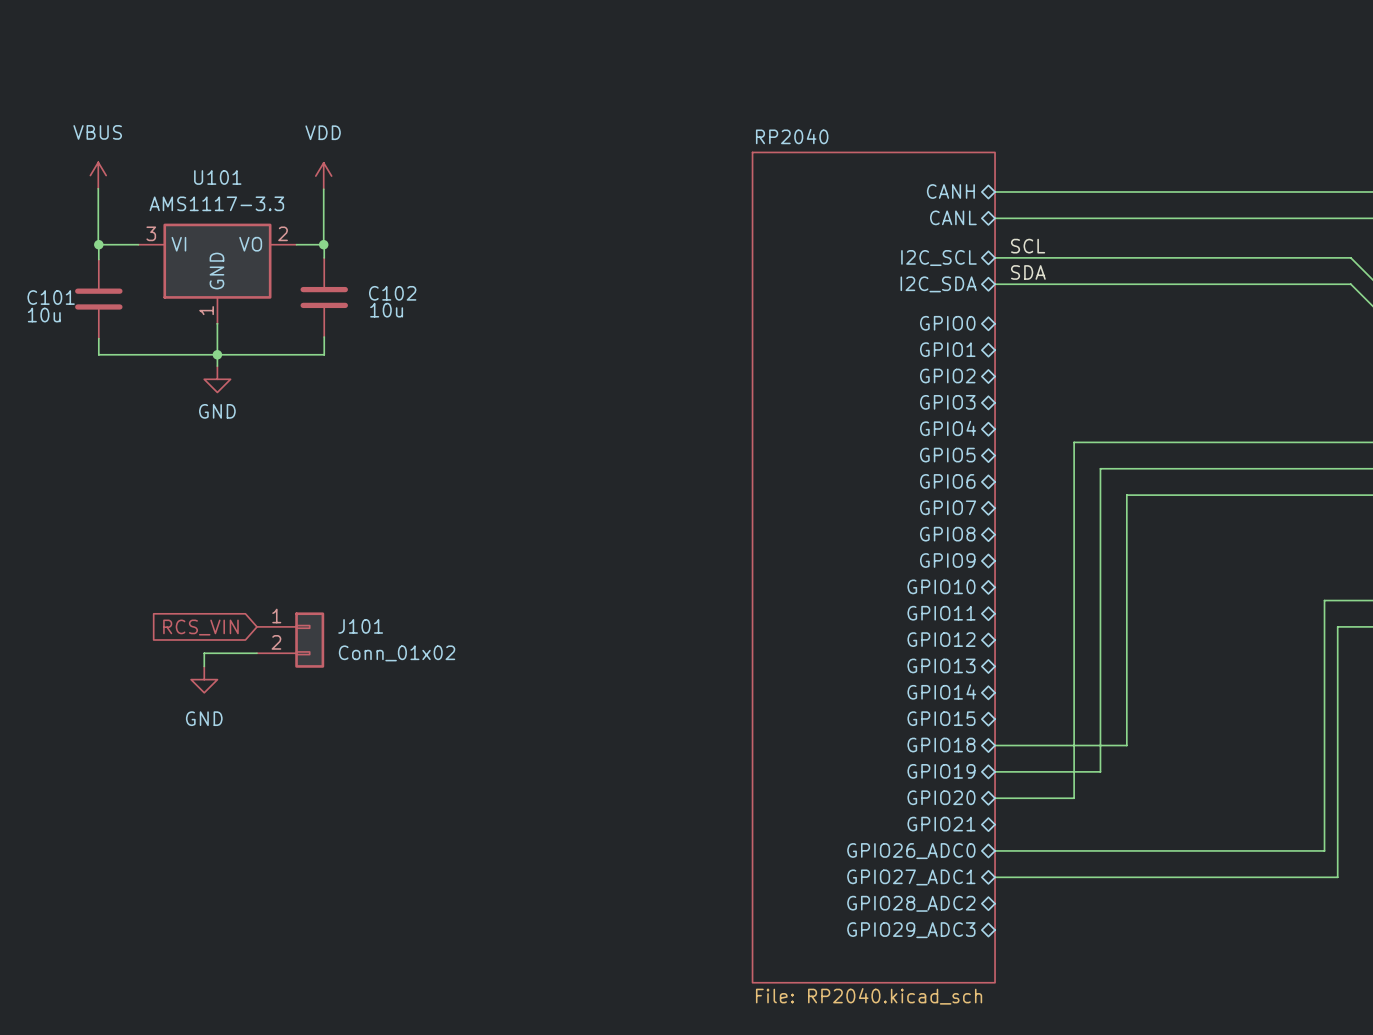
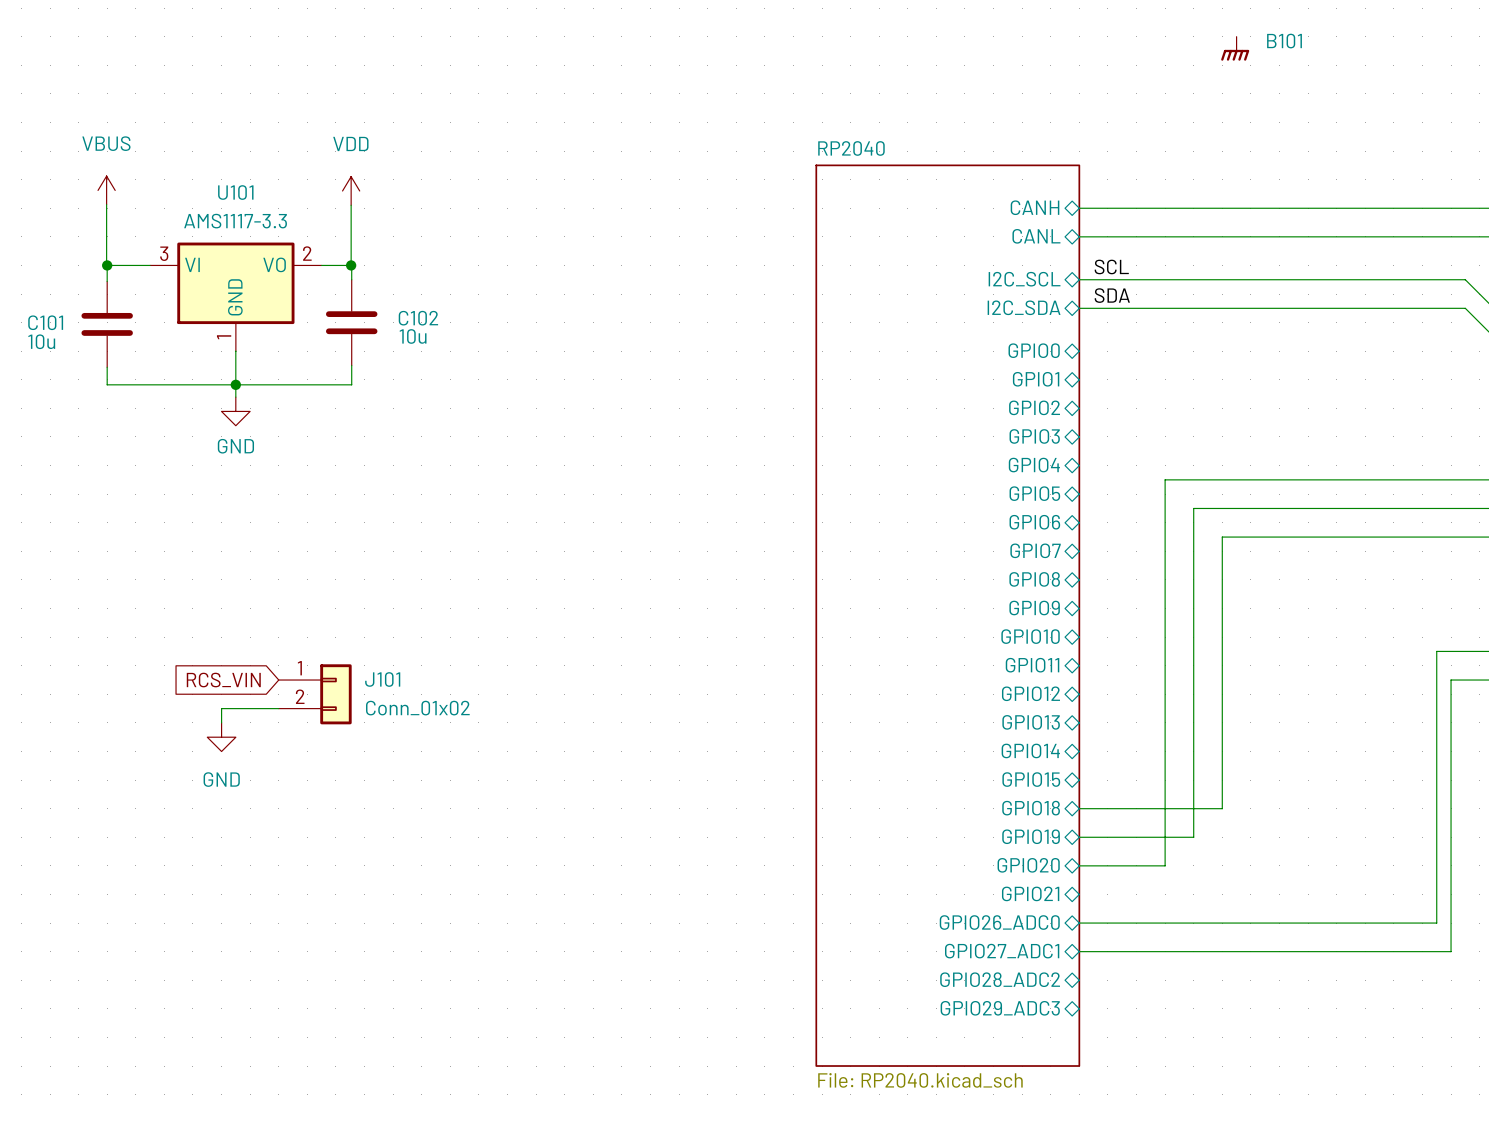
B101: none -> (1235, 48)

